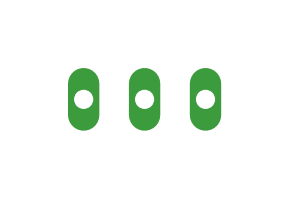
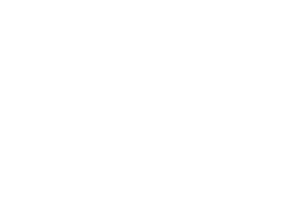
part: (144, 99) -> none

